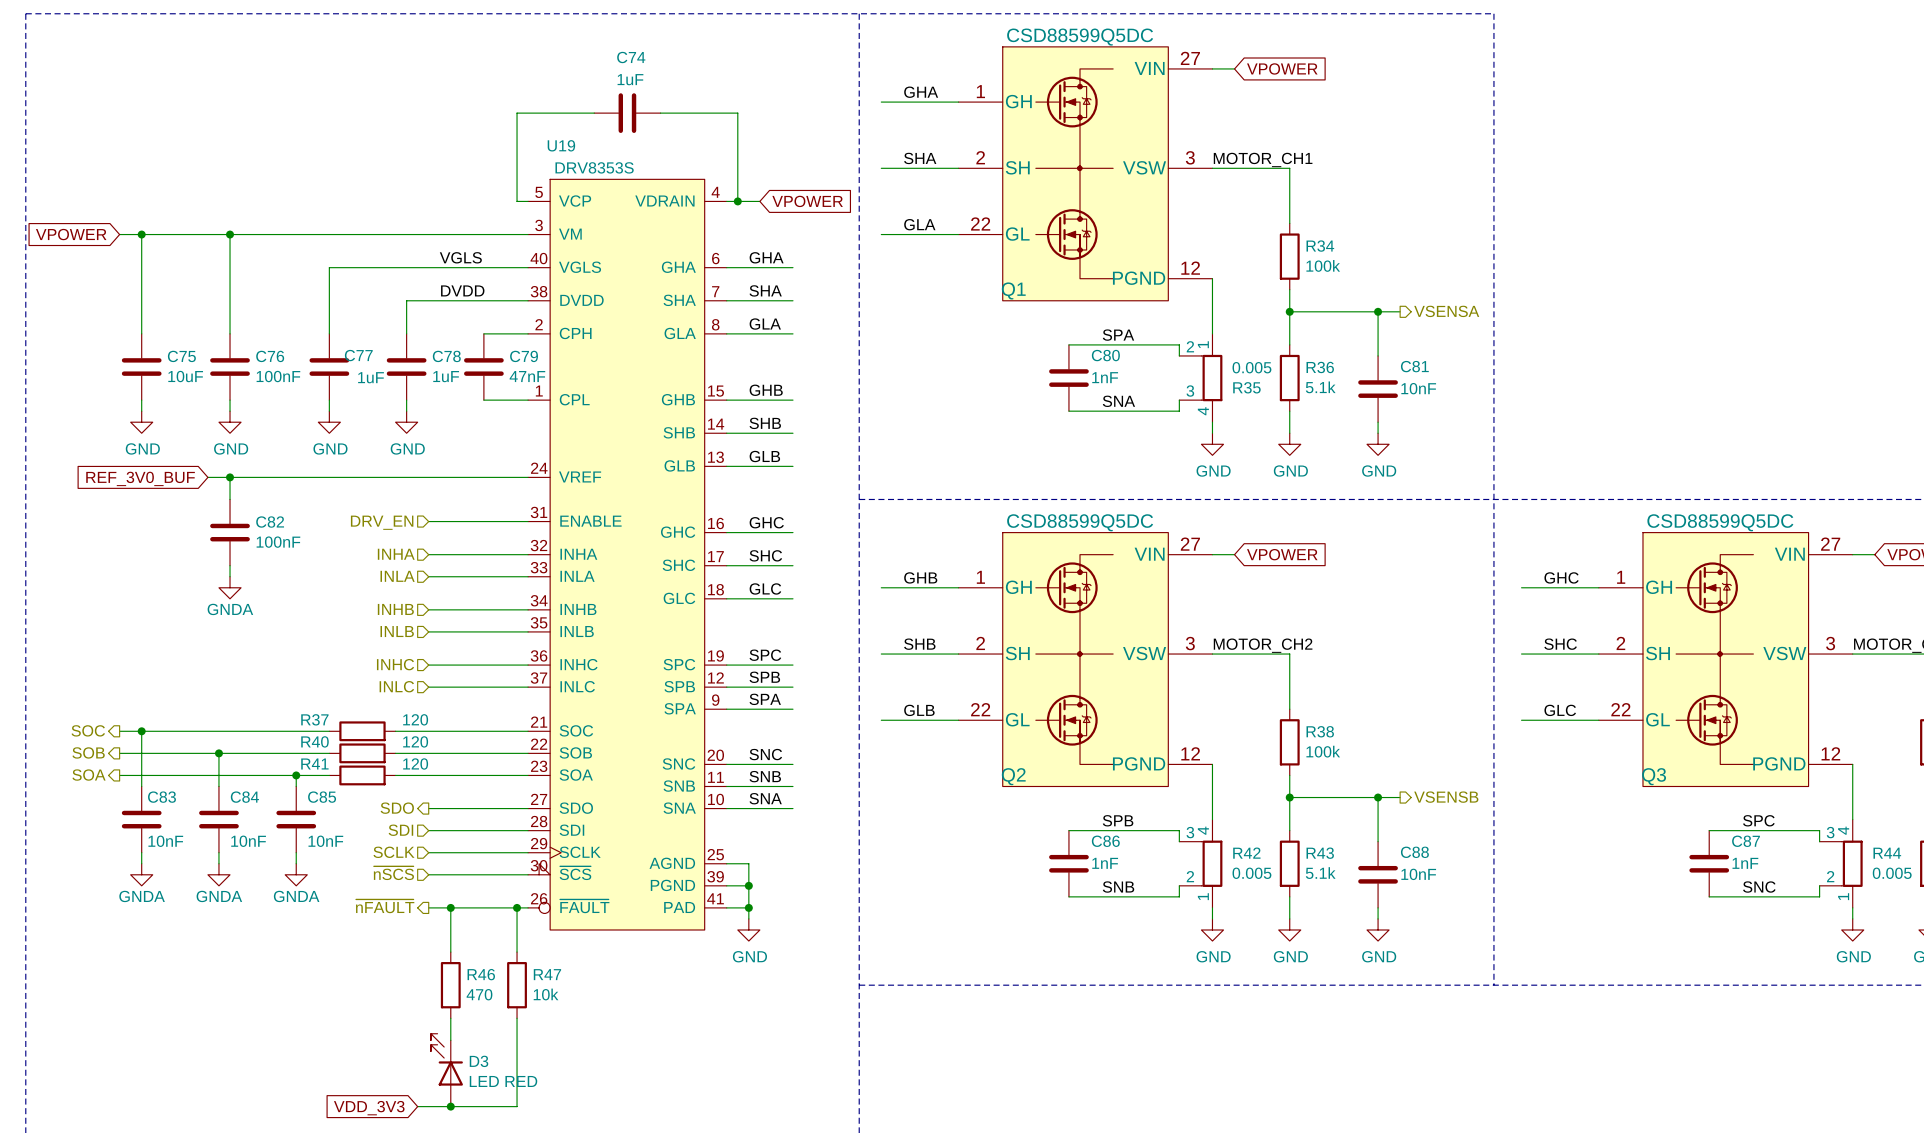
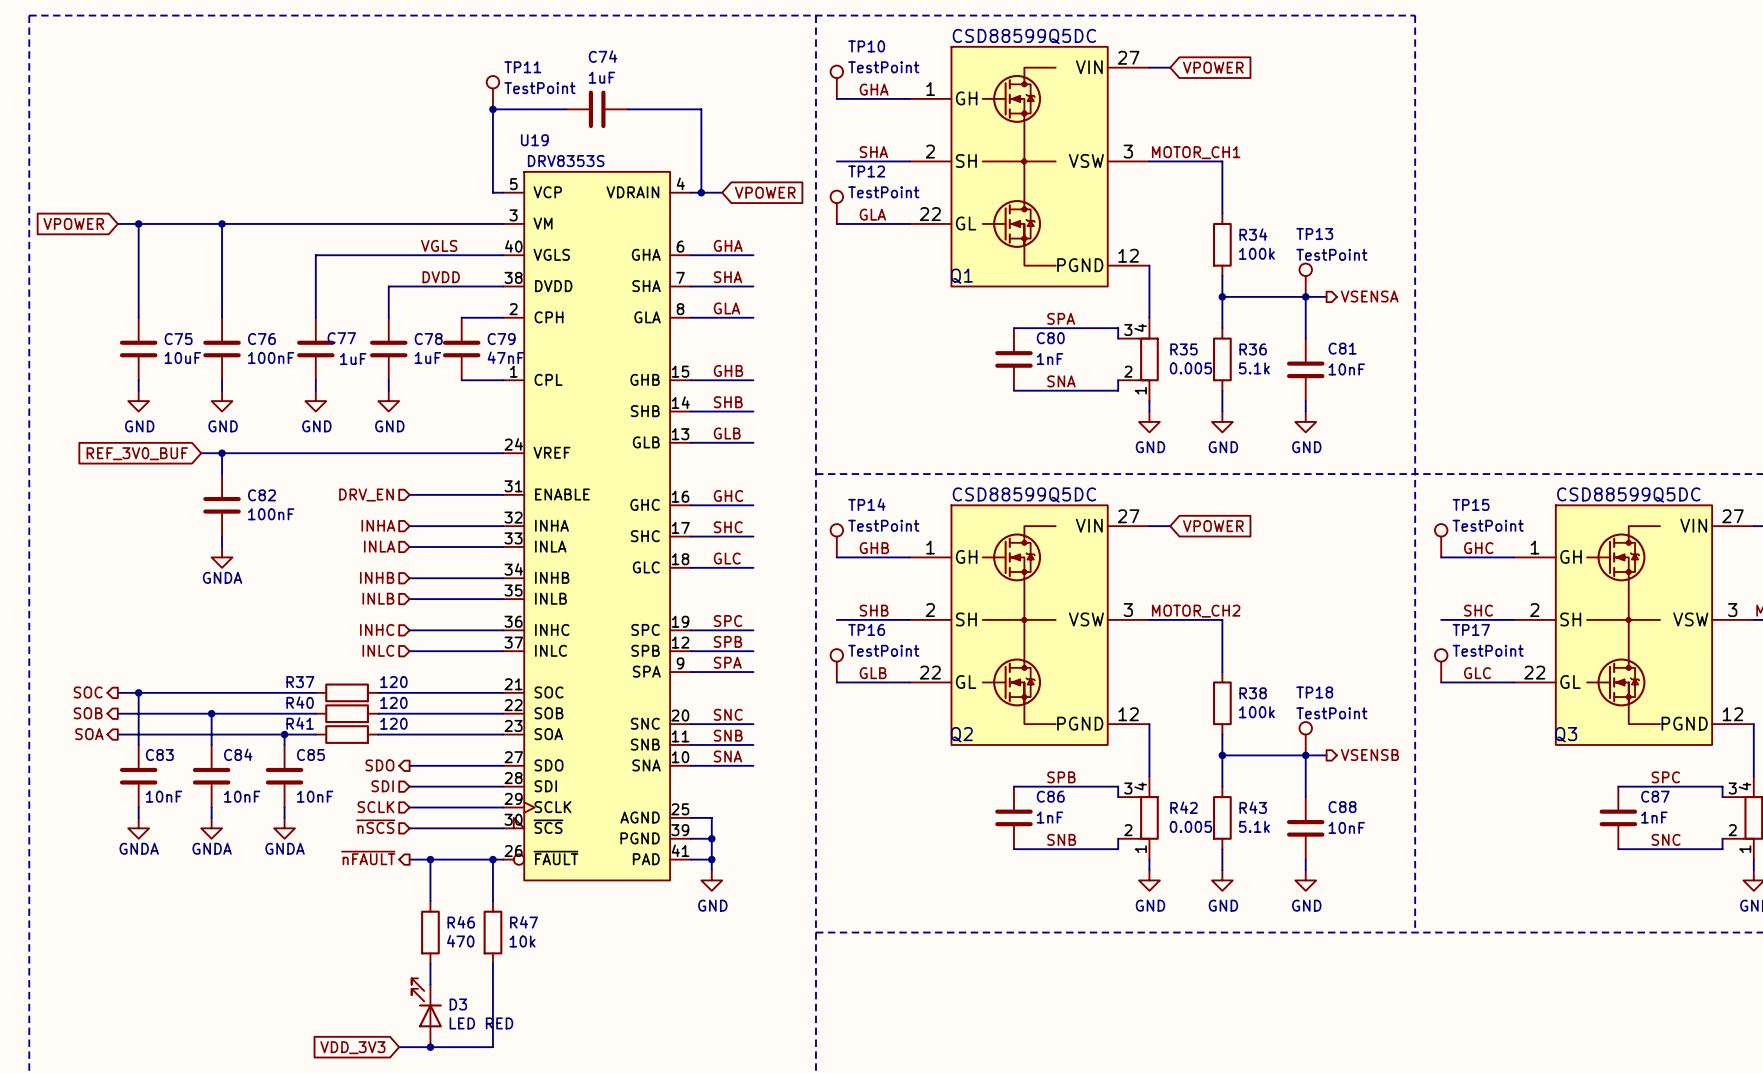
TP10: none -> TestPoint (836, 82)
TP11: none -> TestPoint (492, 92)
junction: none -> (492, 109)
TP12: none -> TestPoint (836, 207)
TP13: none -> TestPoint (1305, 280)
R35 flip: as is (1211, 378) -> up-down (1148, 359)
TP14: none -> TestPoint (836, 540)
TP15: none -> TestPoint (1441, 540)
TP16: none -> TestPoint (836, 665)
TP17: none -> TestPoint (1441, 665)
TP18: none -> TestPoint (1305, 738)

